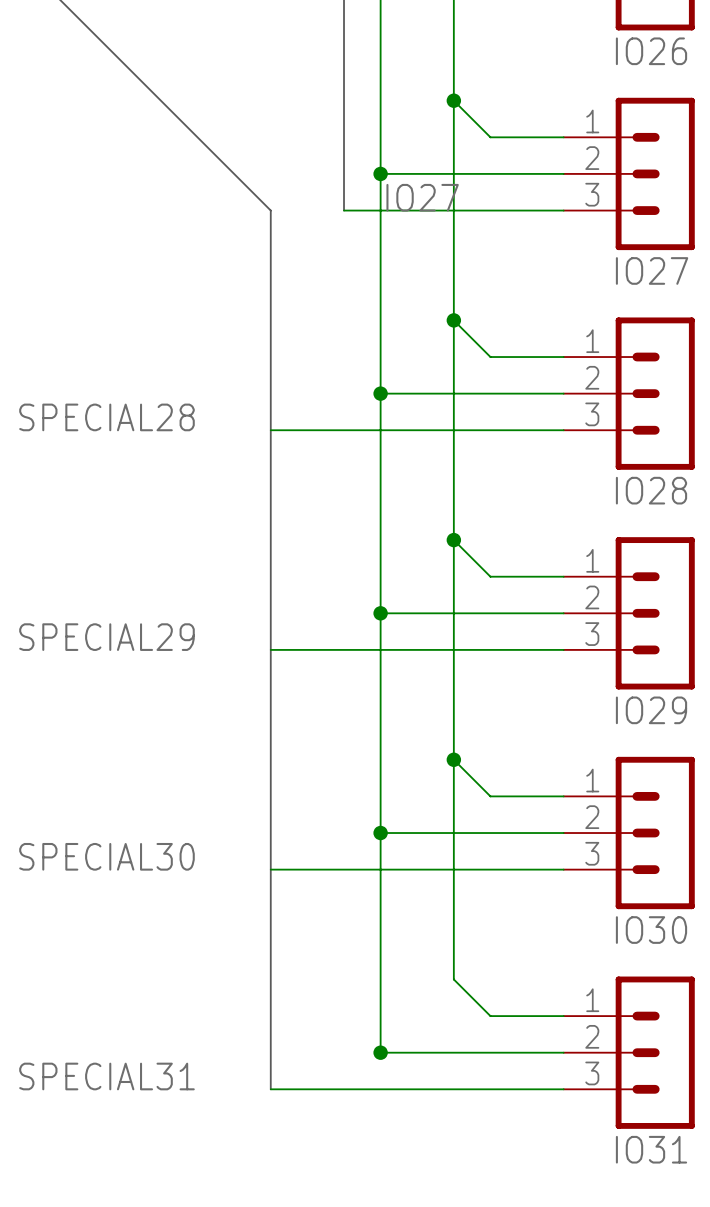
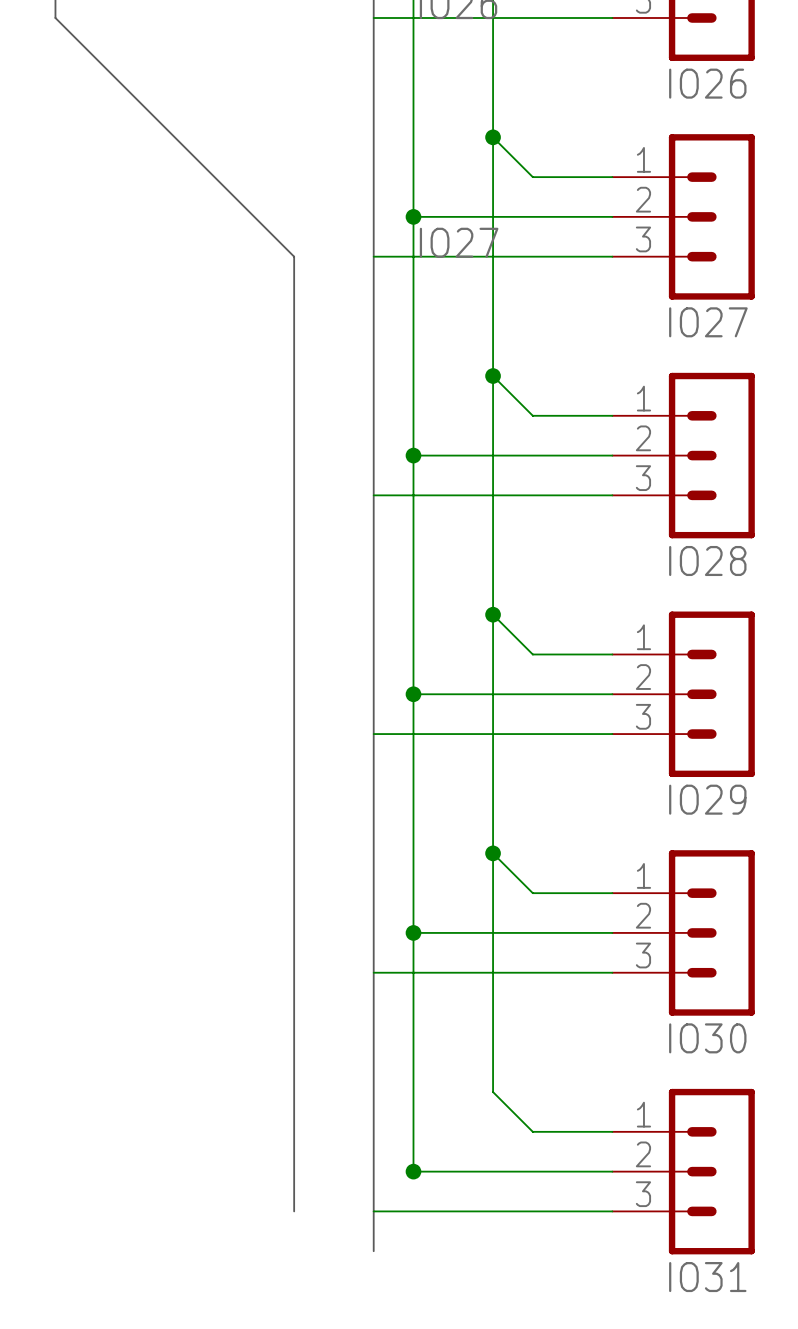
bus: none -> (373, 256) (373, 1251)
label: SPECIAL28 (106, 417) -> none
wire: (270, 430) (344, 430) -> none
label: SPECIAL29 (106, 637) -> none
wire: (270, 649) (344, 649) -> none
label: SPECIAL30 (106, 856) -> none
wire: (270, 869) (344, 869) -> none
label: SPECIAL31 (106, 1076) -> none
wire: (270, 1089) (344, 1089) -> none

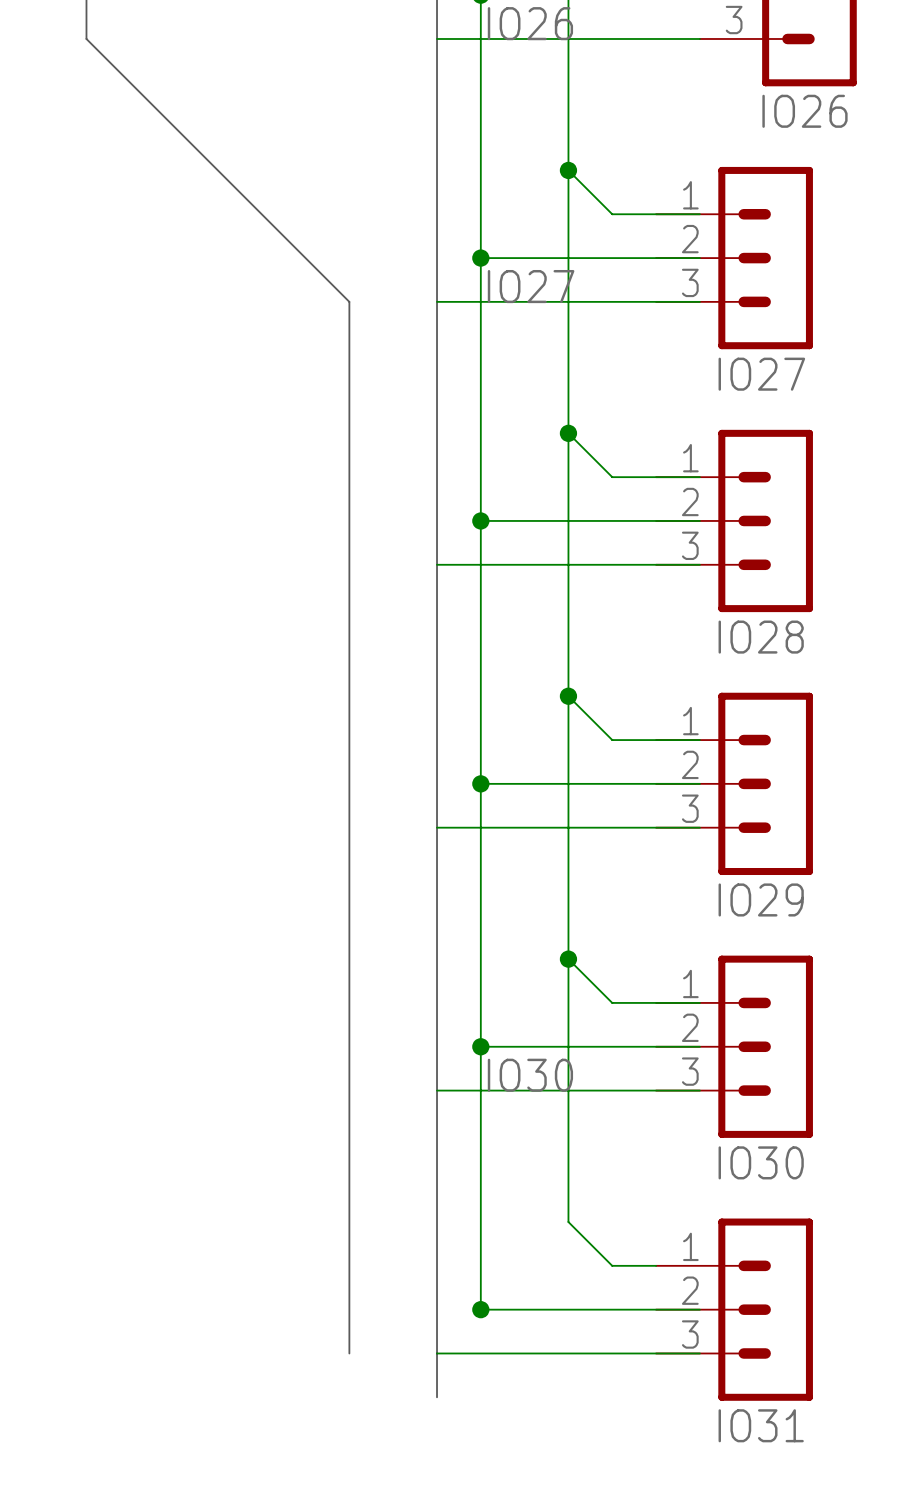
IO27 position: (683, 216) -> (734, 258)
IO28 position: (683, 455) -> (734, 520)
IO29 position: (683, 694) -> (734, 783)
IO30 position: (683, 932) -> (734, 1046)
label: none -> IO30 (530, 1075)
IO31 position: (683, 1171) -> (734, 1309)

